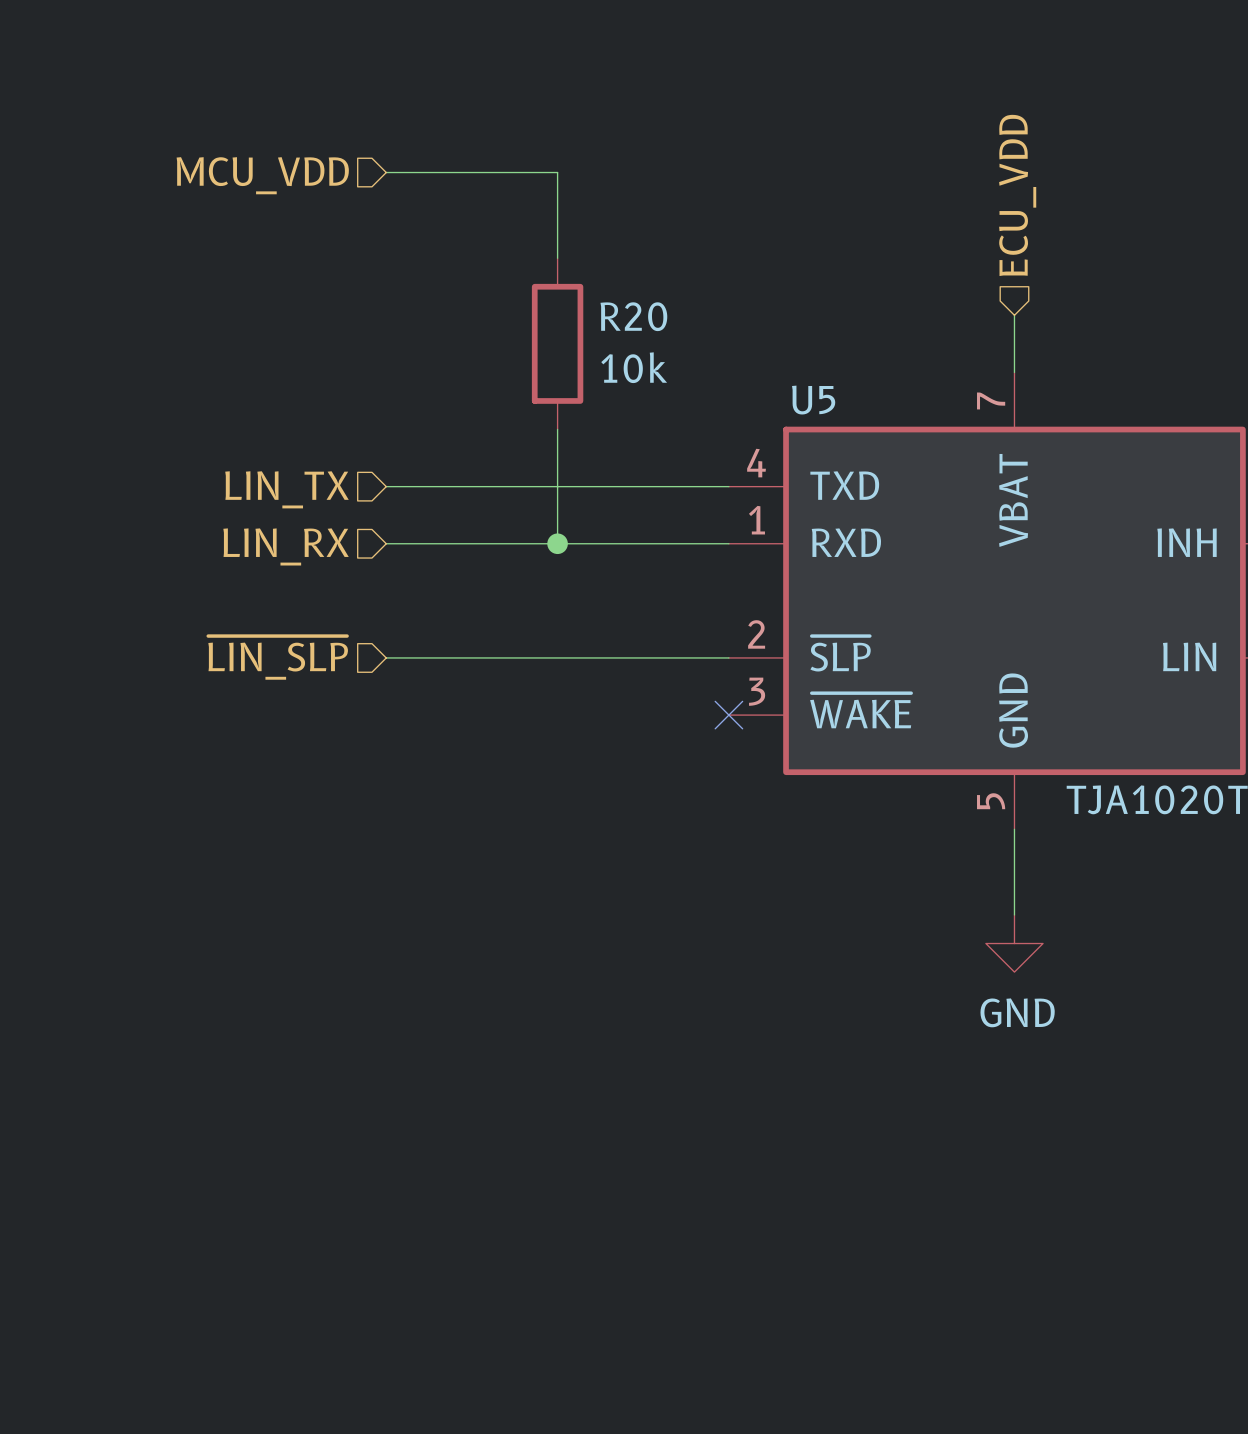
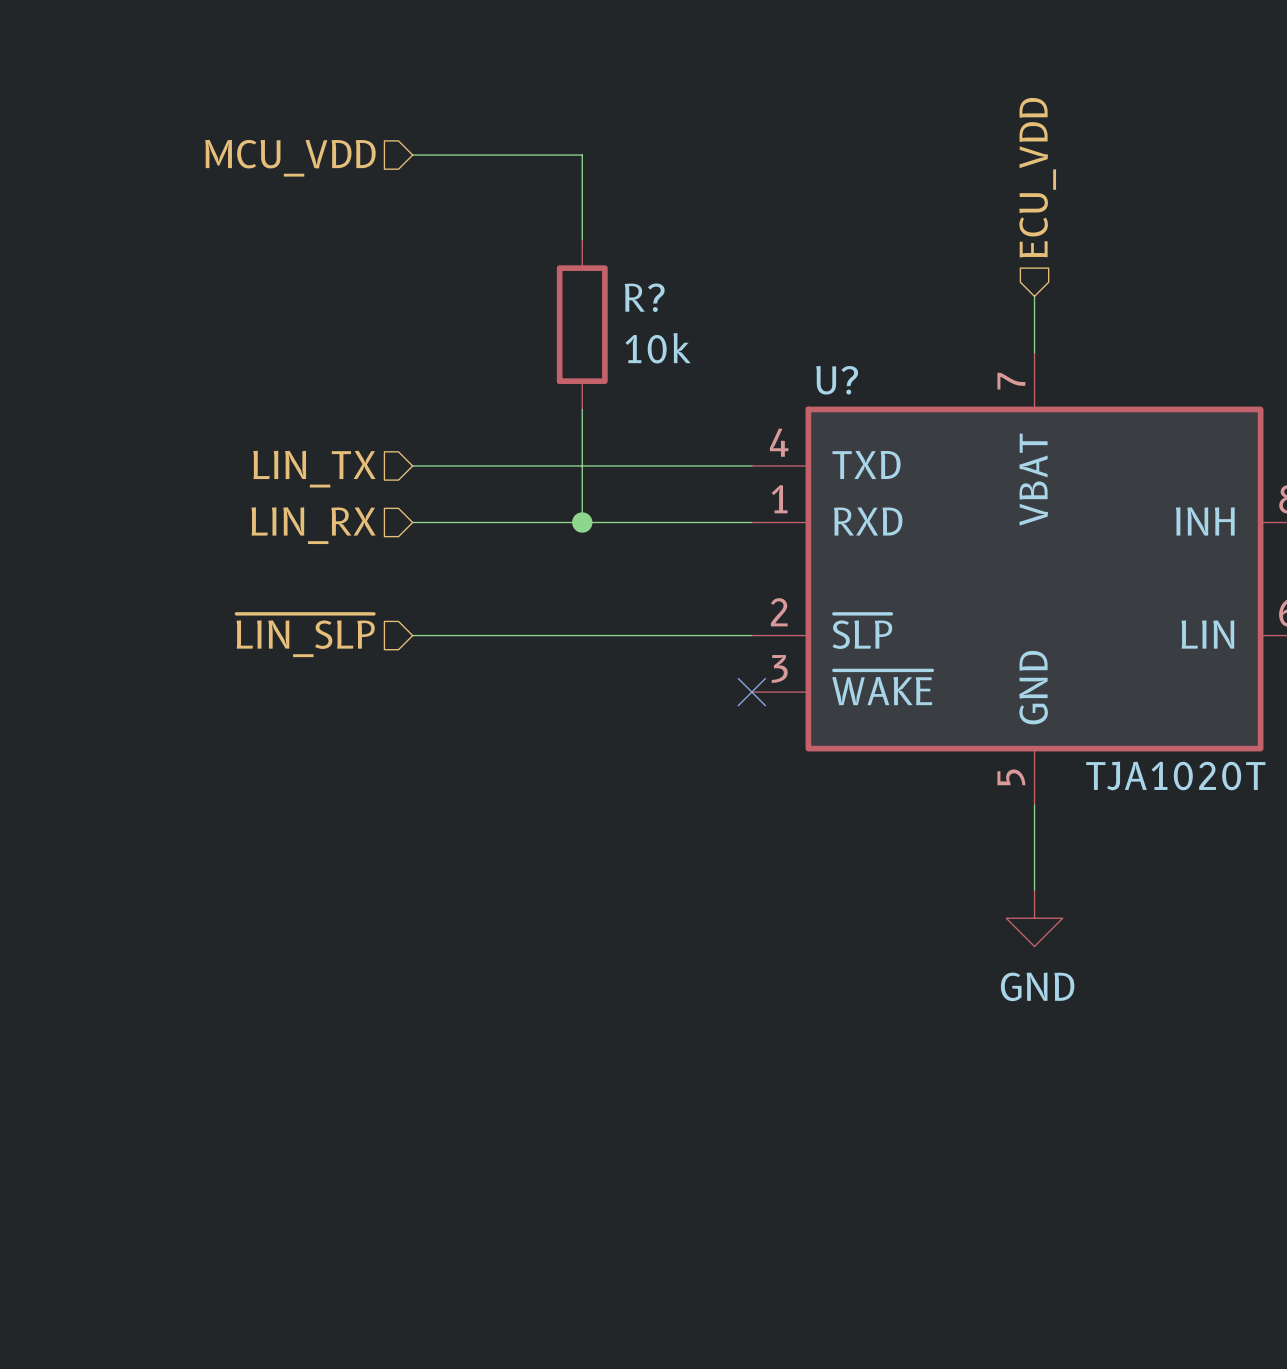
R20 name: R20 (633, 316) -> R? (644, 297)
U5 name: U5 (813, 400) -> U? (837, 380)

